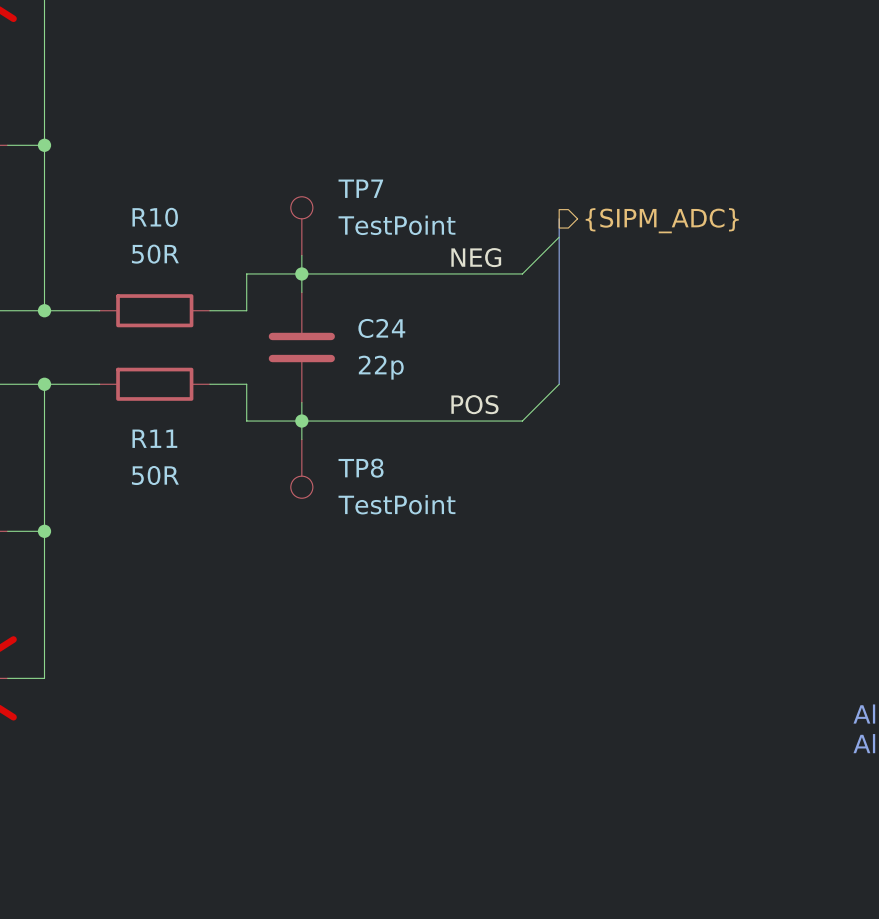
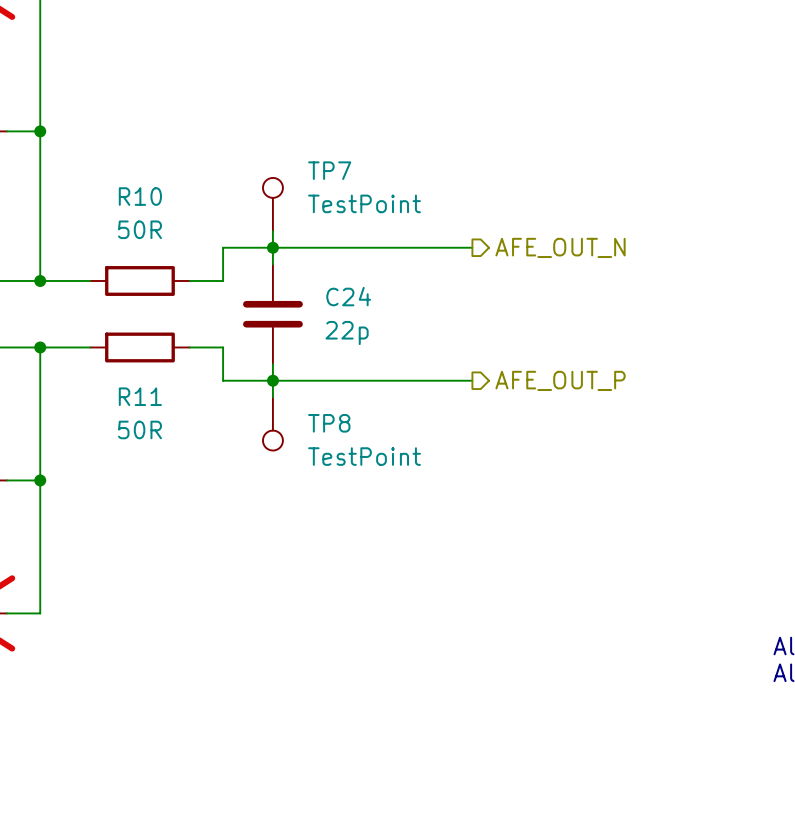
bus: (559, 218) (559, 384) -> none
hierarchical label: {SIPM_ADC} (662, 220) -> none
wire: (559, 237) (522, 273) -> none
label: NEG (476, 257) -> none
hierarchical label: none -> AFE_OUT_N (560, 247)
wire: (559, 384) (522, 421) -> none
label: POS (474, 404) -> none
hierarchical label: none -> AFE_OUT_P (560, 380)

